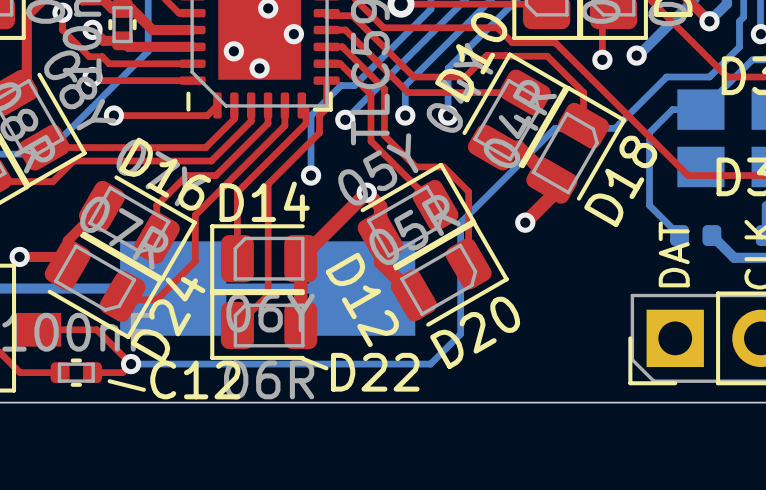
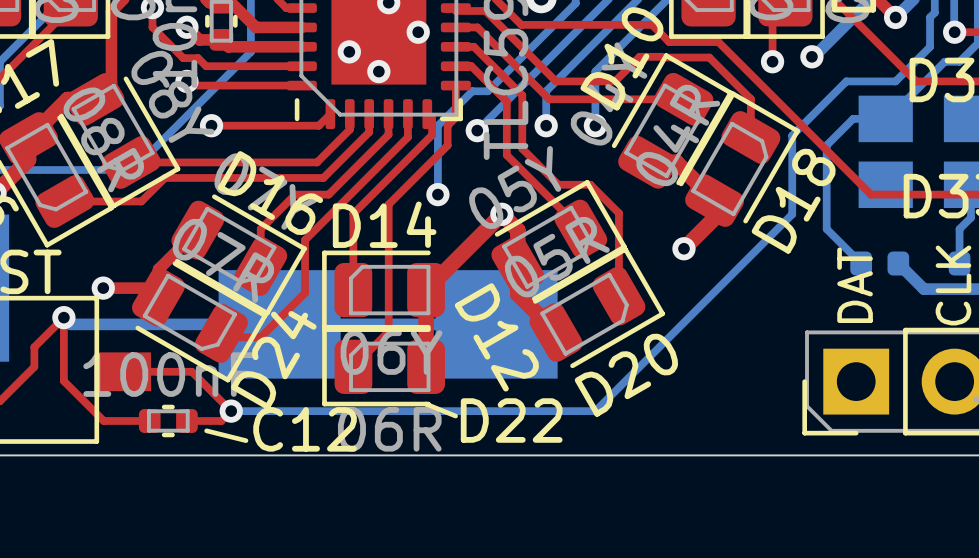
bottom track: (619, 124) (615, 128) (554, 128) (460, 222) (460, 334) (430, 364) -> (792, 135) (792, 214) (595, 411) (575, 411)

